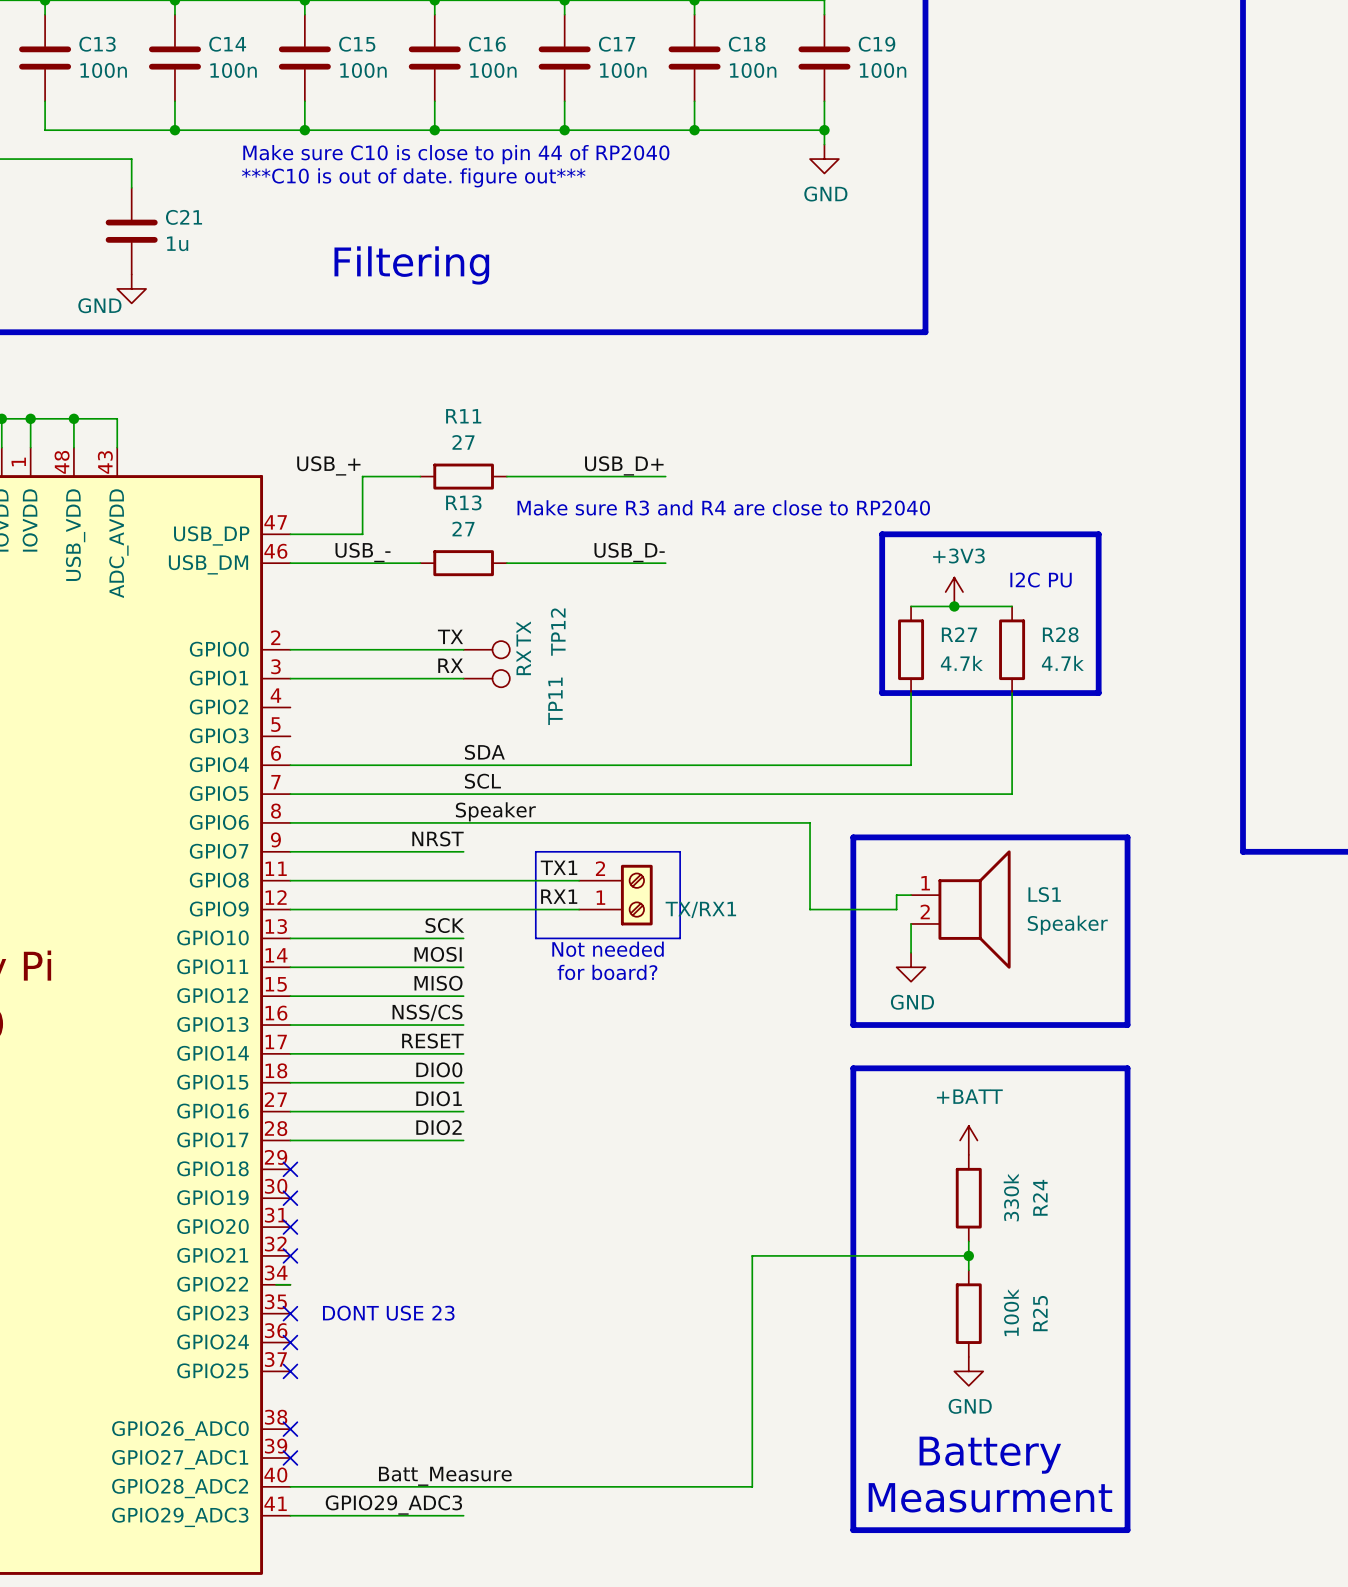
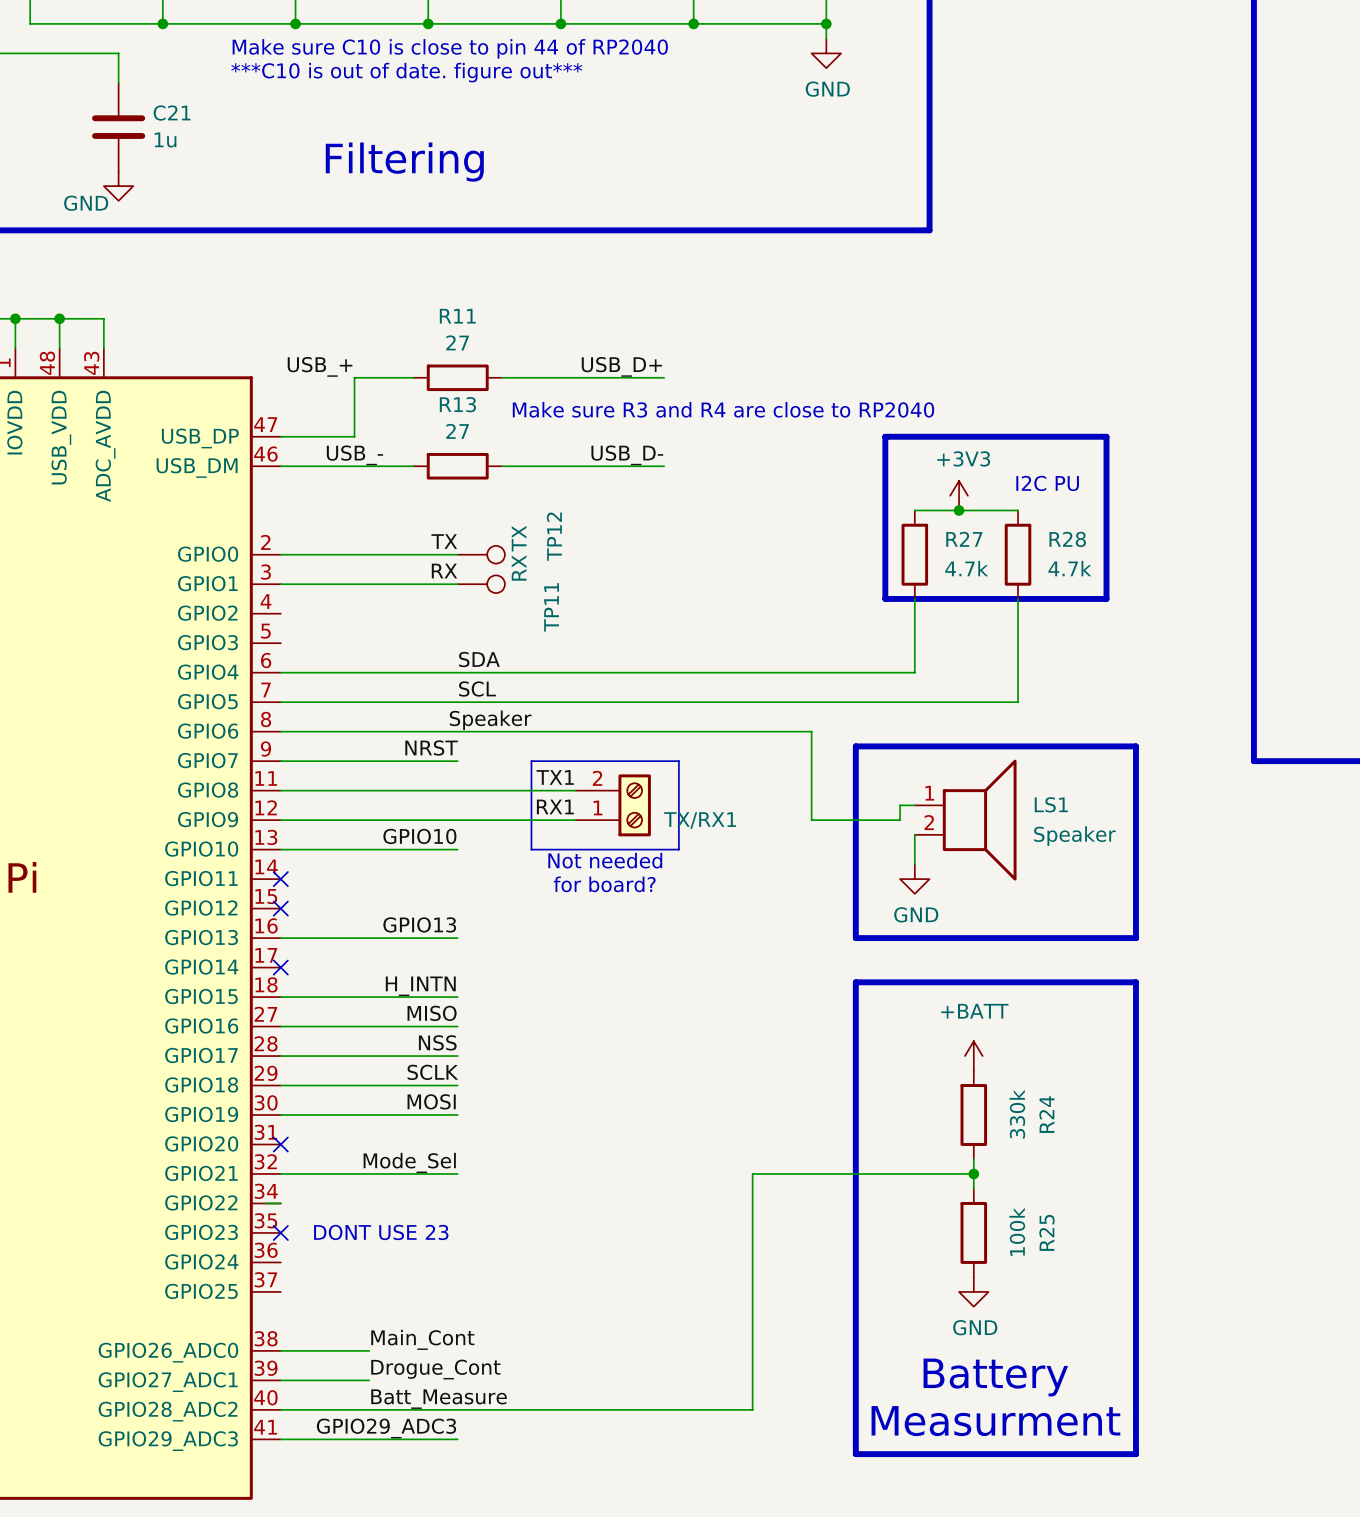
label: SCK (444, 925) -> GPIO10 (419, 836)
label position: MOSI (438, 954) -> MOSI (431, 1101)
wire: (290, 967) (463, 967) -> (280, 1085) (457, 1085)
no-connect mark: none -> (280, 879)
label: MISO (438, 983) -> none
wire: (290, 996) (463, 996) -> (280, 1115) (457, 1115)
no-connect mark: none -> (280, 908)
label: NSS/CS (427, 1012) -> GPIO13 (419, 924)
label: RESET (432, 1041) -> none
wire: (290, 1053) (463, 1053) -> (280, 1173) (457, 1173)
no-connect mark: none -> (280, 967)
label: DIO0 (439, 1069) -> H_INTN (420, 986)
label: DIO1 (439, 1098) -> MISO (432, 1013)
label: DIO2 (438, 1127) -> NSS (437, 1042)
label: none -> SCLK (432, 1072)
no-connect mark: (290, 1169) -> none
no-connect mark: (290, 1198) -> none
label: none -> Mode_Sel (409, 1162)
no-connect mark: (290, 1255) -> none
no-connect mark: (290, 1342) -> none
no-connect mark: (290, 1371) -> none
label: none -> Main_Cont (422, 1339)
wire: none -> (280, 1350) (369, 1350)
no-connect mark: (290, 1429) -> none
label: none -> Drogue_Cont (435, 1369)
wire: none -> (280, 1380) (369, 1380)
no-connect mark: (290, 1458) -> none

